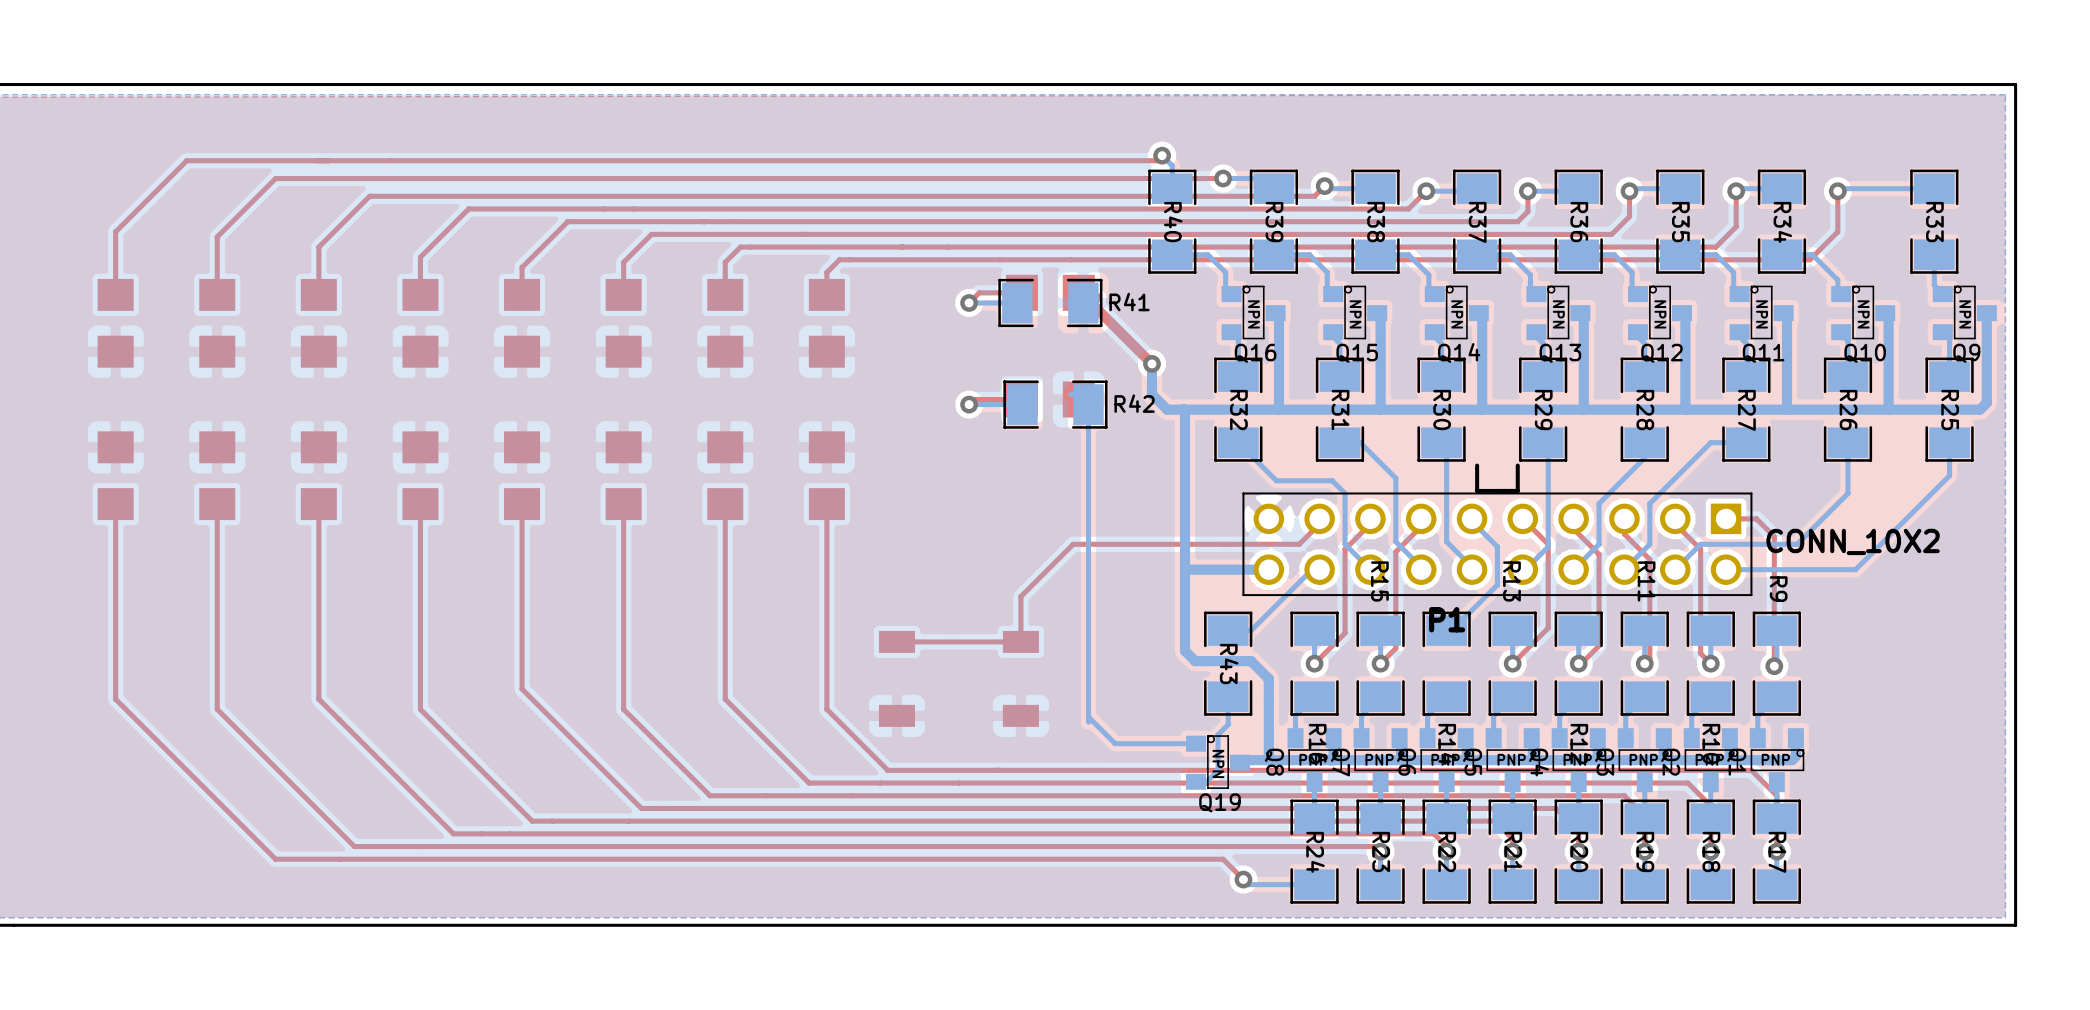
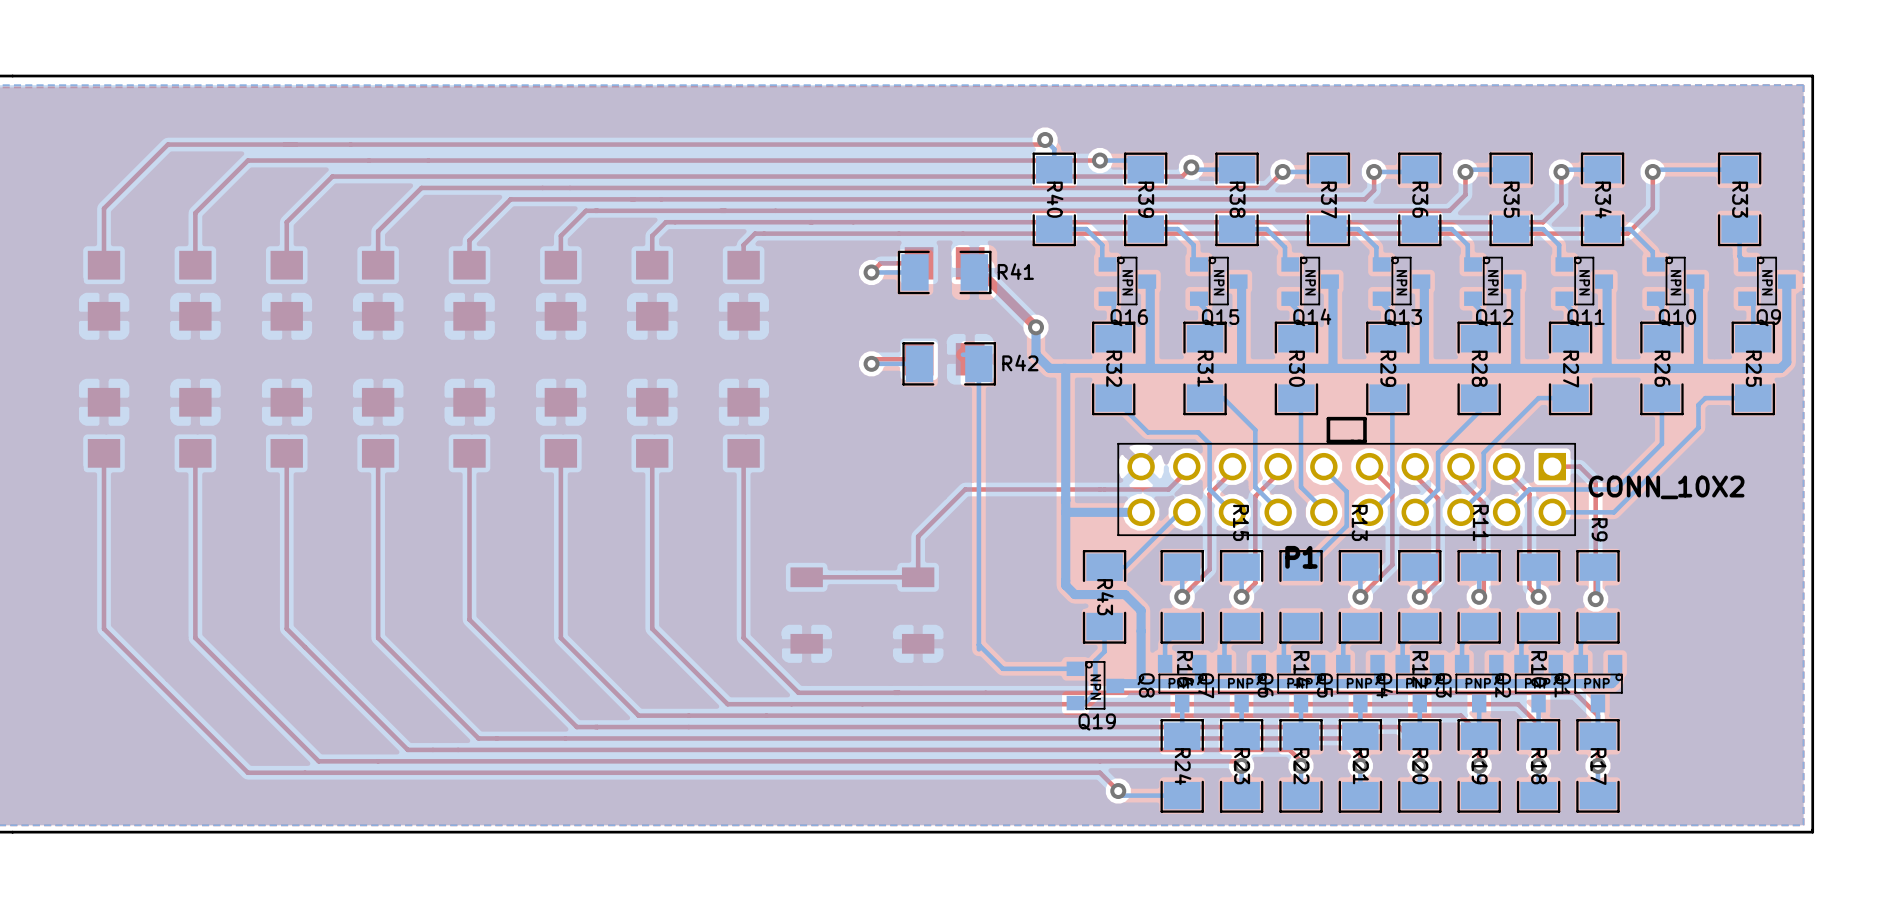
bottom track: (1949, 442) (1949, 475) (1855, 569) (1794, 569) -> (1753, 398) (1705, 398) (1698, 404) (1698, 427) (1613, 512)
line: none -> (1364, 418) (1328, 418)

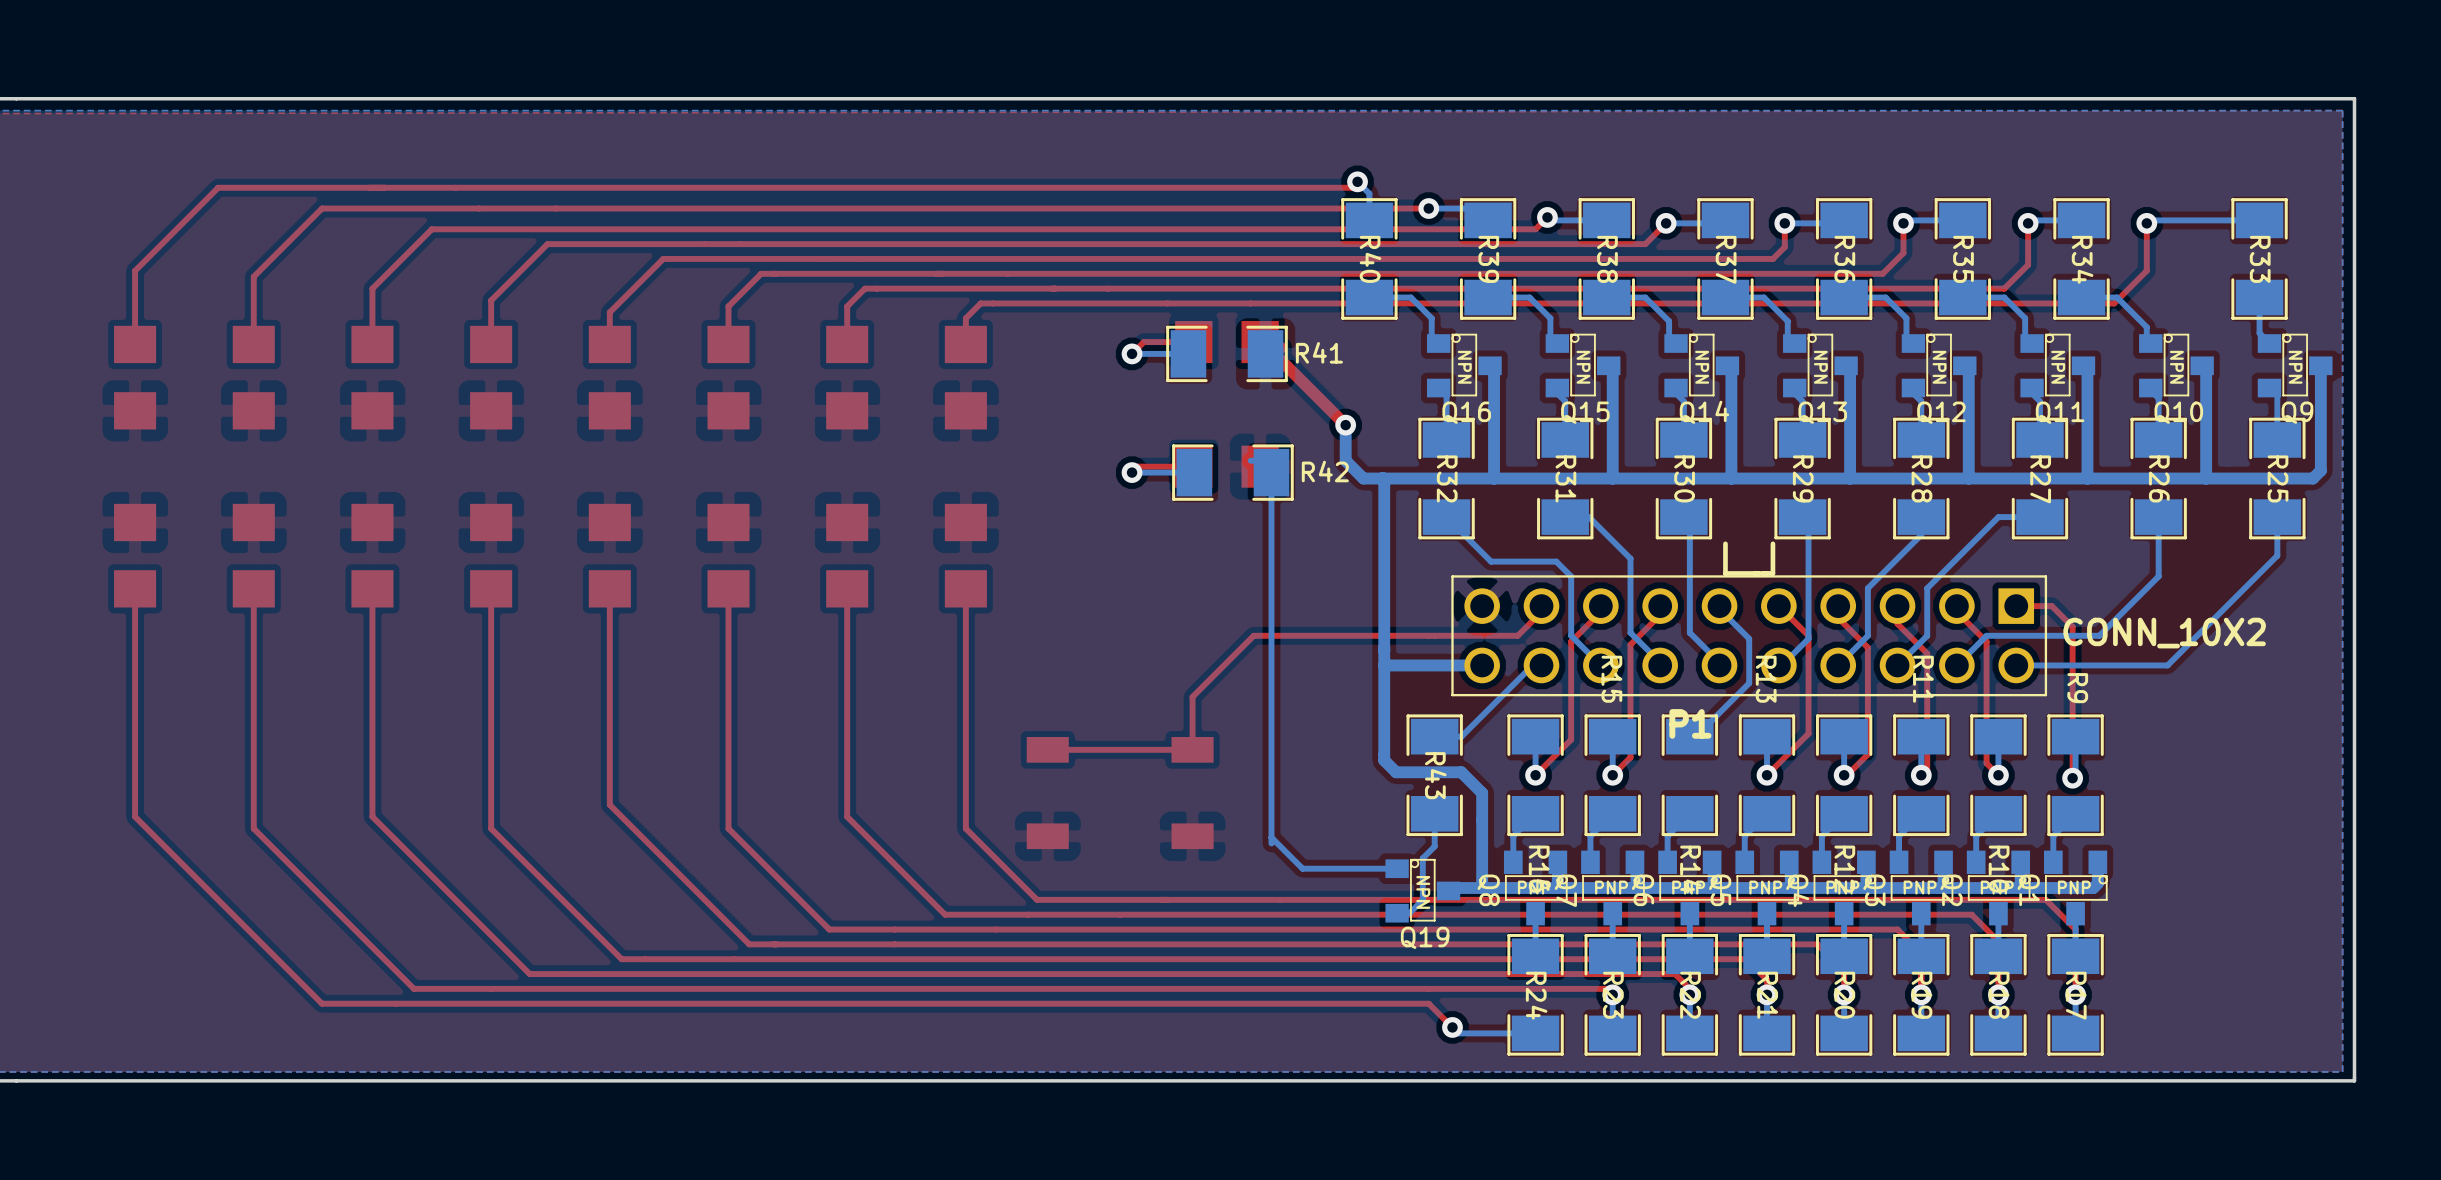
bottom track: (1753, 398) (1705, 398) (1698, 404) (1698, 427) (1613, 512) -> (2277, 517) (2277, 555) (2167, 665) (2096, 665)
line: (1364, 418) (1328, 418) -> none

